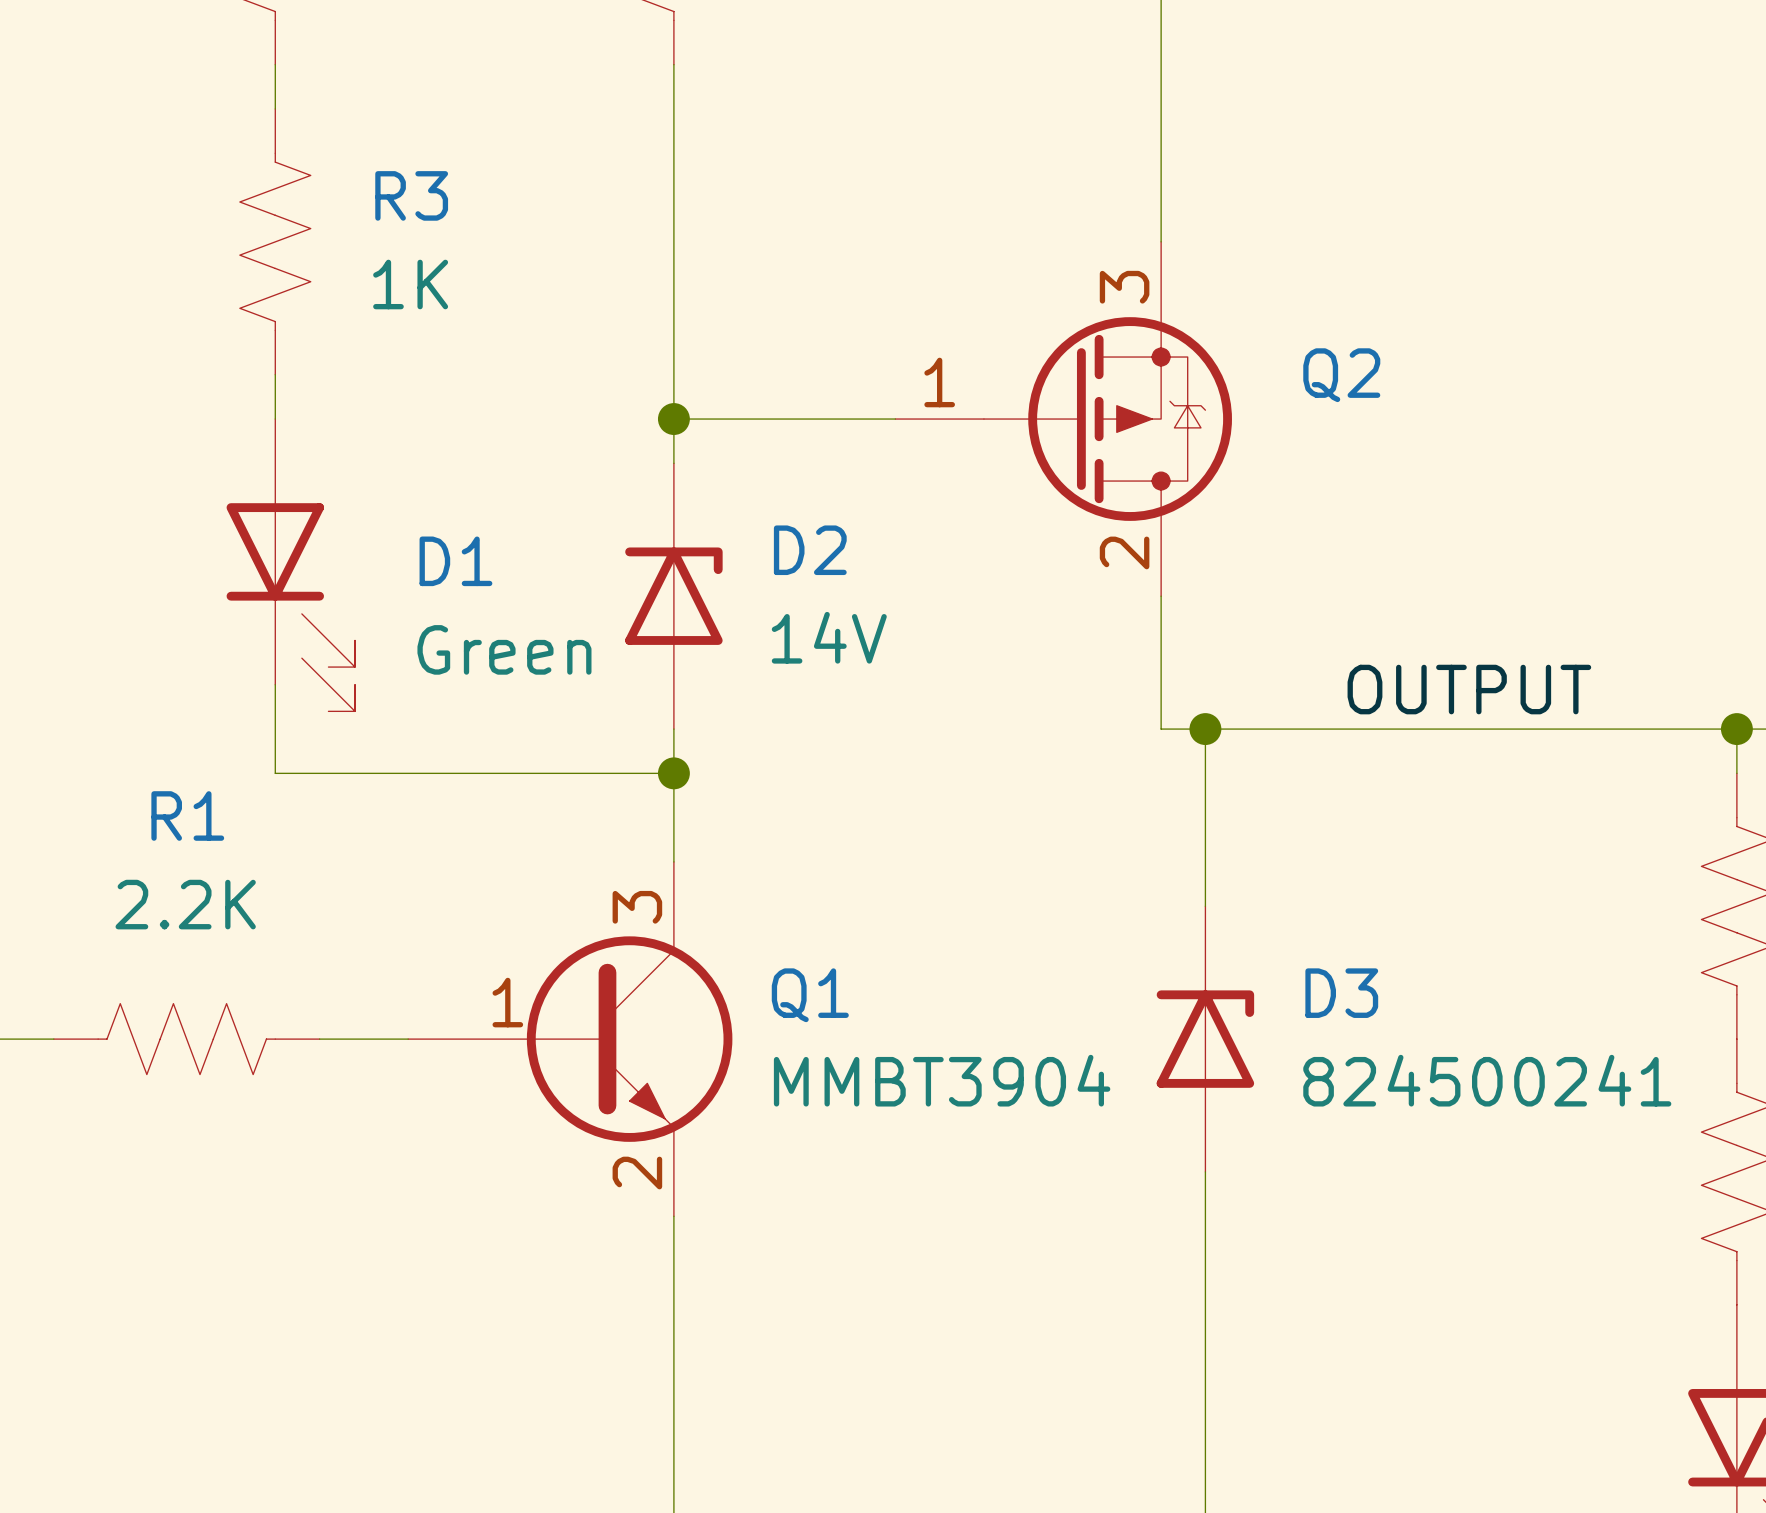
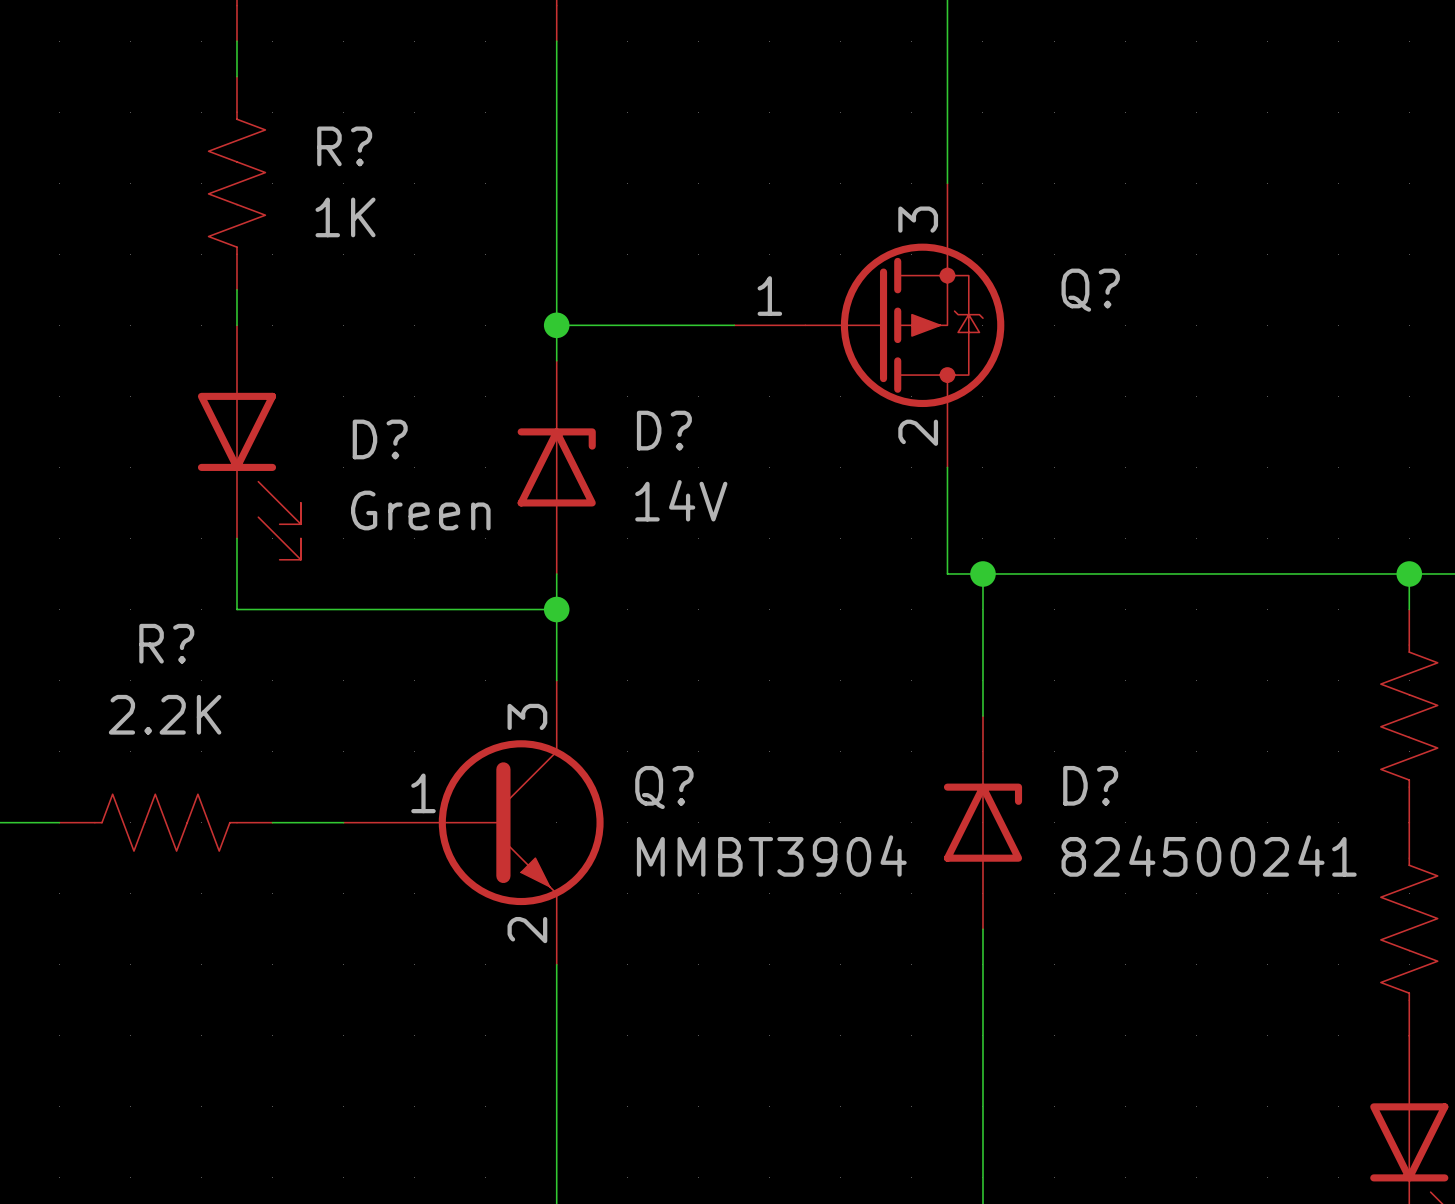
R3 name: R3 (411, 195) -> R? (344, 146)
Q2 name: Q2 (1341, 375) -> Q? (1090, 290)
D2 name: D2 (810, 550) -> D? (664, 430)
D1 name: D1 (455, 561) -> D? (380, 439)
label: OUTPUT (1469, 689) -> none
R1 name: R1 (187, 815) -> R? (166, 643)
D3 name: D3 (1341, 993) -> D? (1090, 785)
Q1 name: Q1 (810, 995) -> Q? (664, 787)

